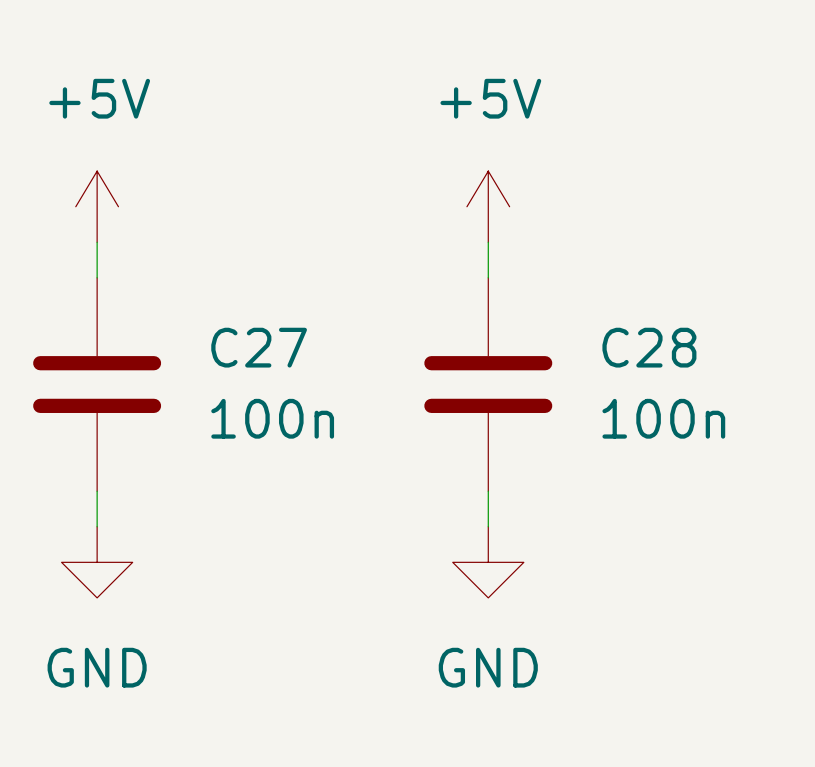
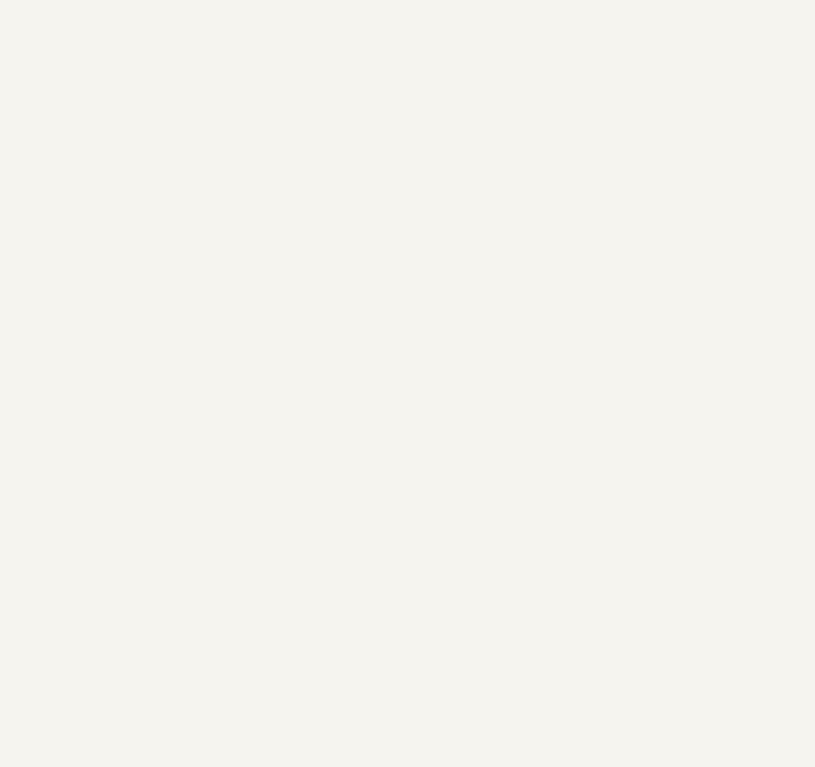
power symbol: +5V (97, 206) -> none
power symbol: +5V (488, 206) -> none
wire: (97, 242) (97, 277) -> none
wire: (488, 242) (488, 277) -> none
C27: 100n (97, 384) -> none
C28: 100n (488, 384) -> none
wire: (97, 491) (97, 526) -> none
wire: (488, 491) (488, 526) -> none
power symbol: GND (97, 562) -> none
power symbol: GND (488, 562) -> none

